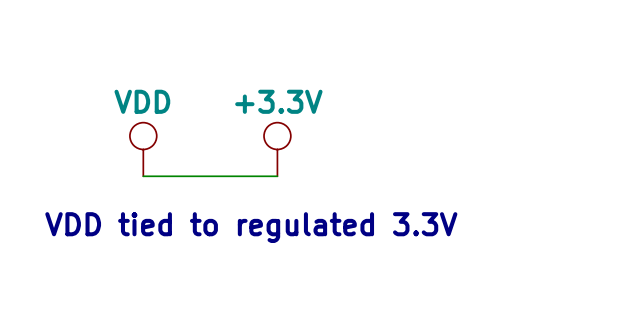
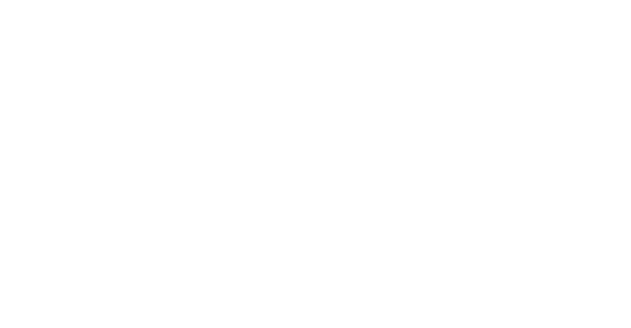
power symbol: VDD (143, 149) -> none
power symbol: +3.3V (277, 149) -> none
wire: (143, 176) (277, 176) -> none
text: VDD tied to regulated 3.3V (251, 227) -> none

